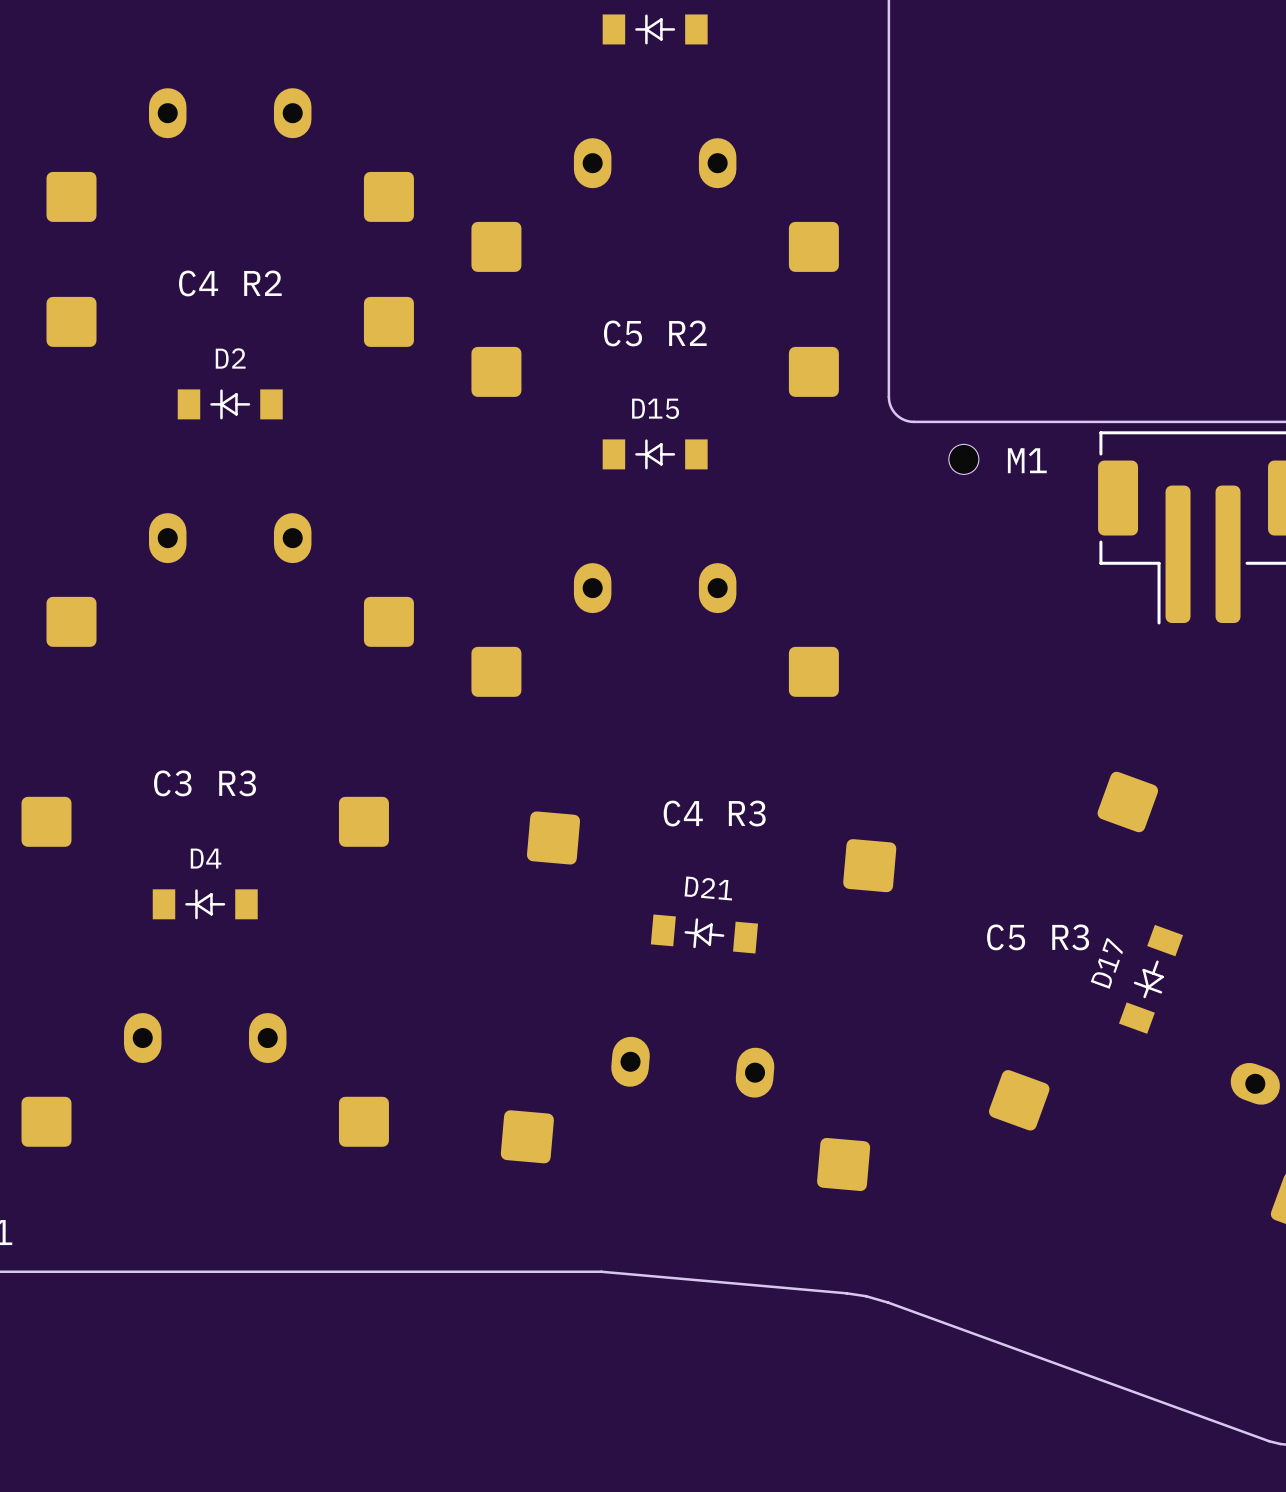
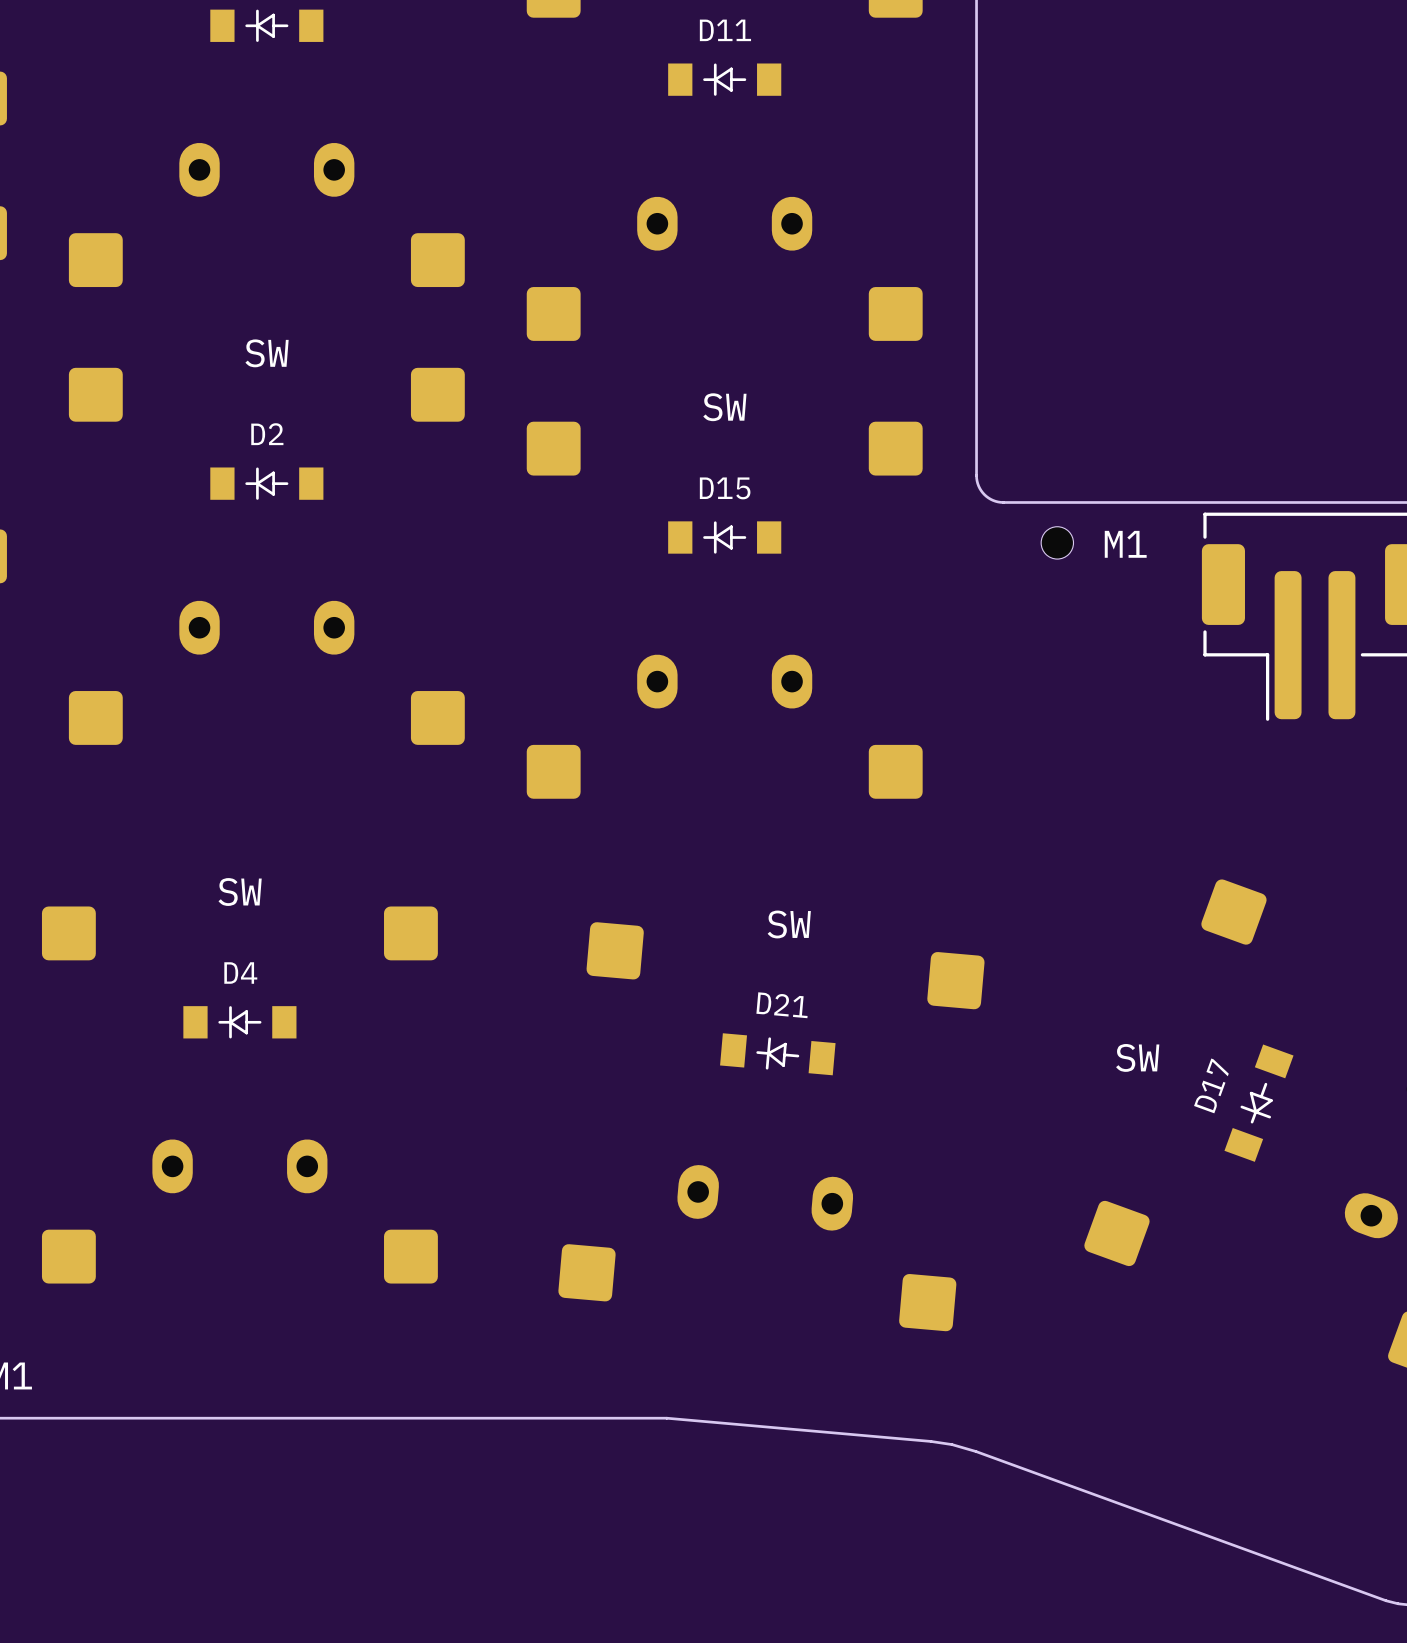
C4 R2 name: C4 R2 (230, 283) -> SW (267, 353)
C5 R2 name: C5 R2 (655, 333) -> SW (724, 407)
C3 R3 name: C3 R3 (205, 783) -> SW (240, 892)
C4 R3 name: C4 R3 (714, 813) -> SW (789, 924)
C5 R3 name: C5 R3 (1038, 937) -> SW (1137, 1057)

